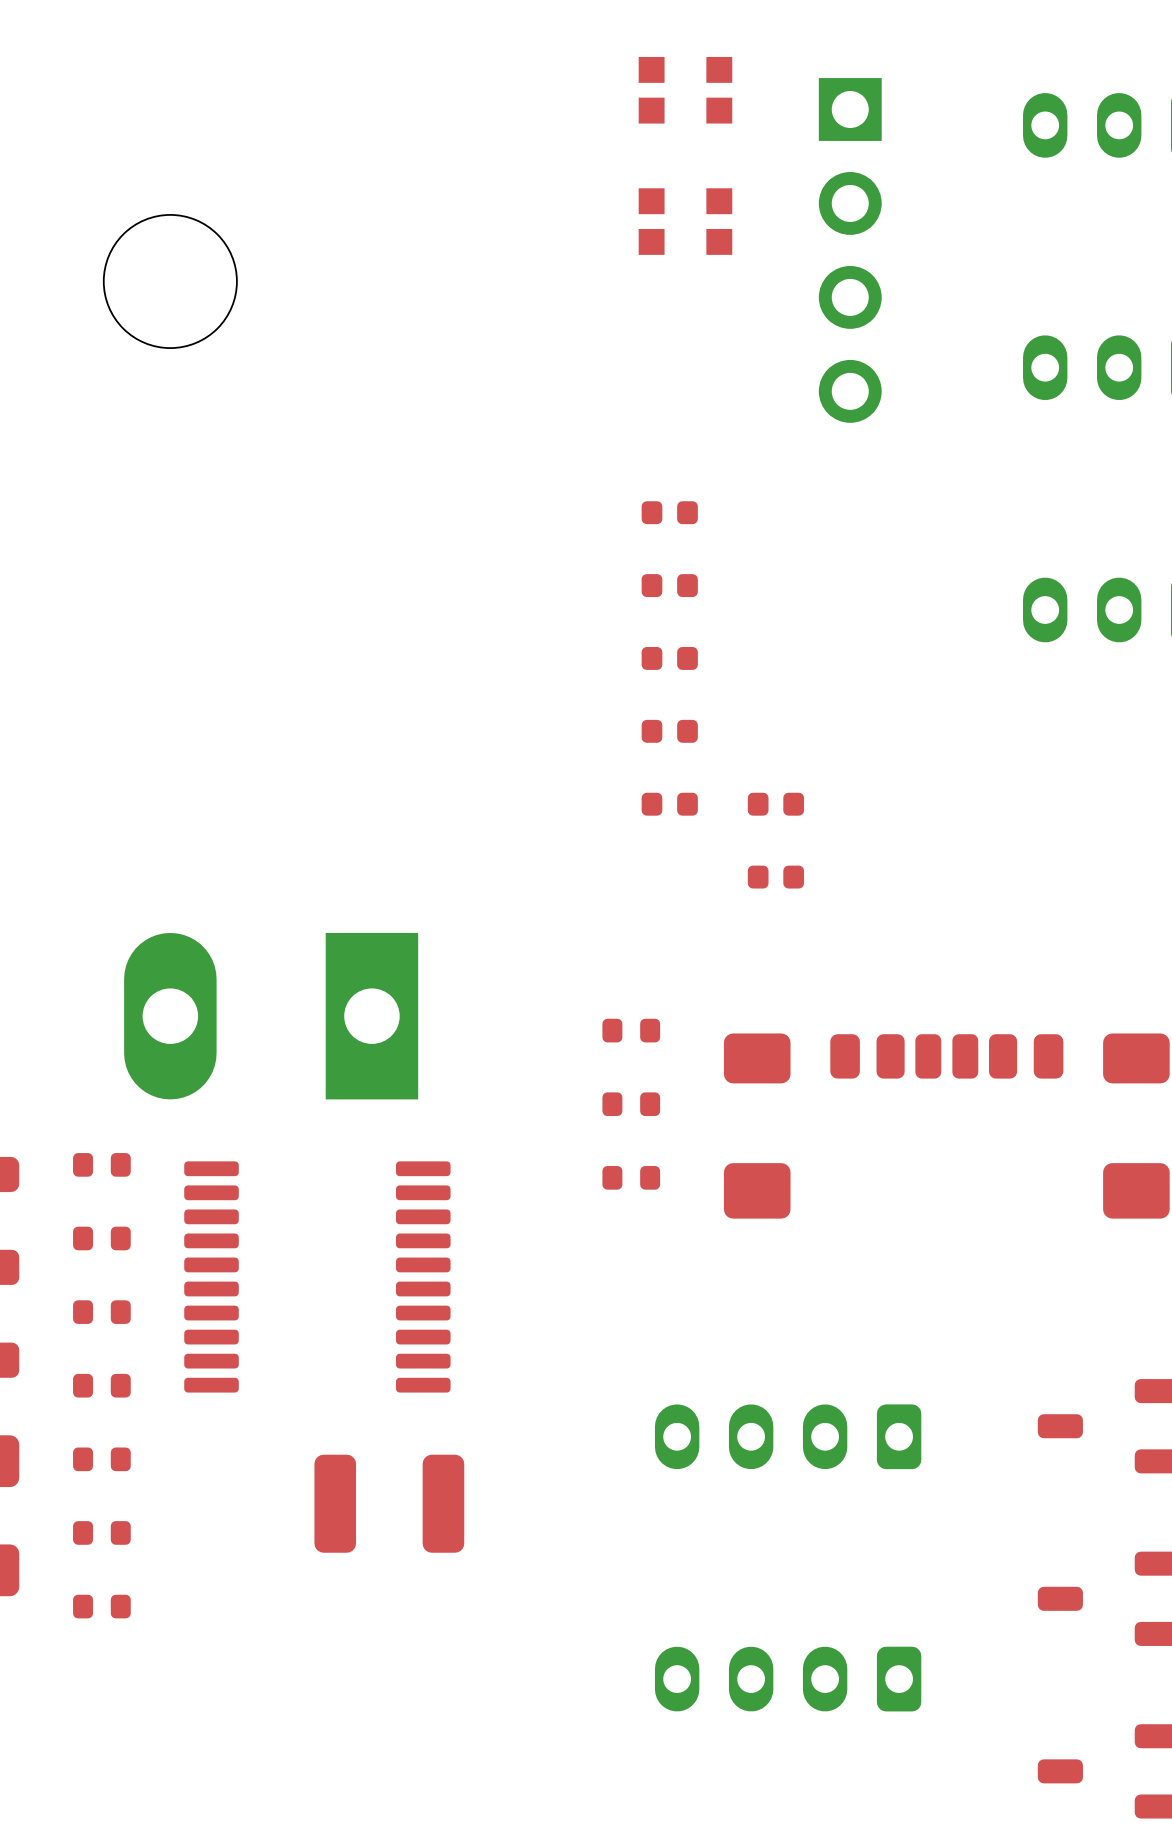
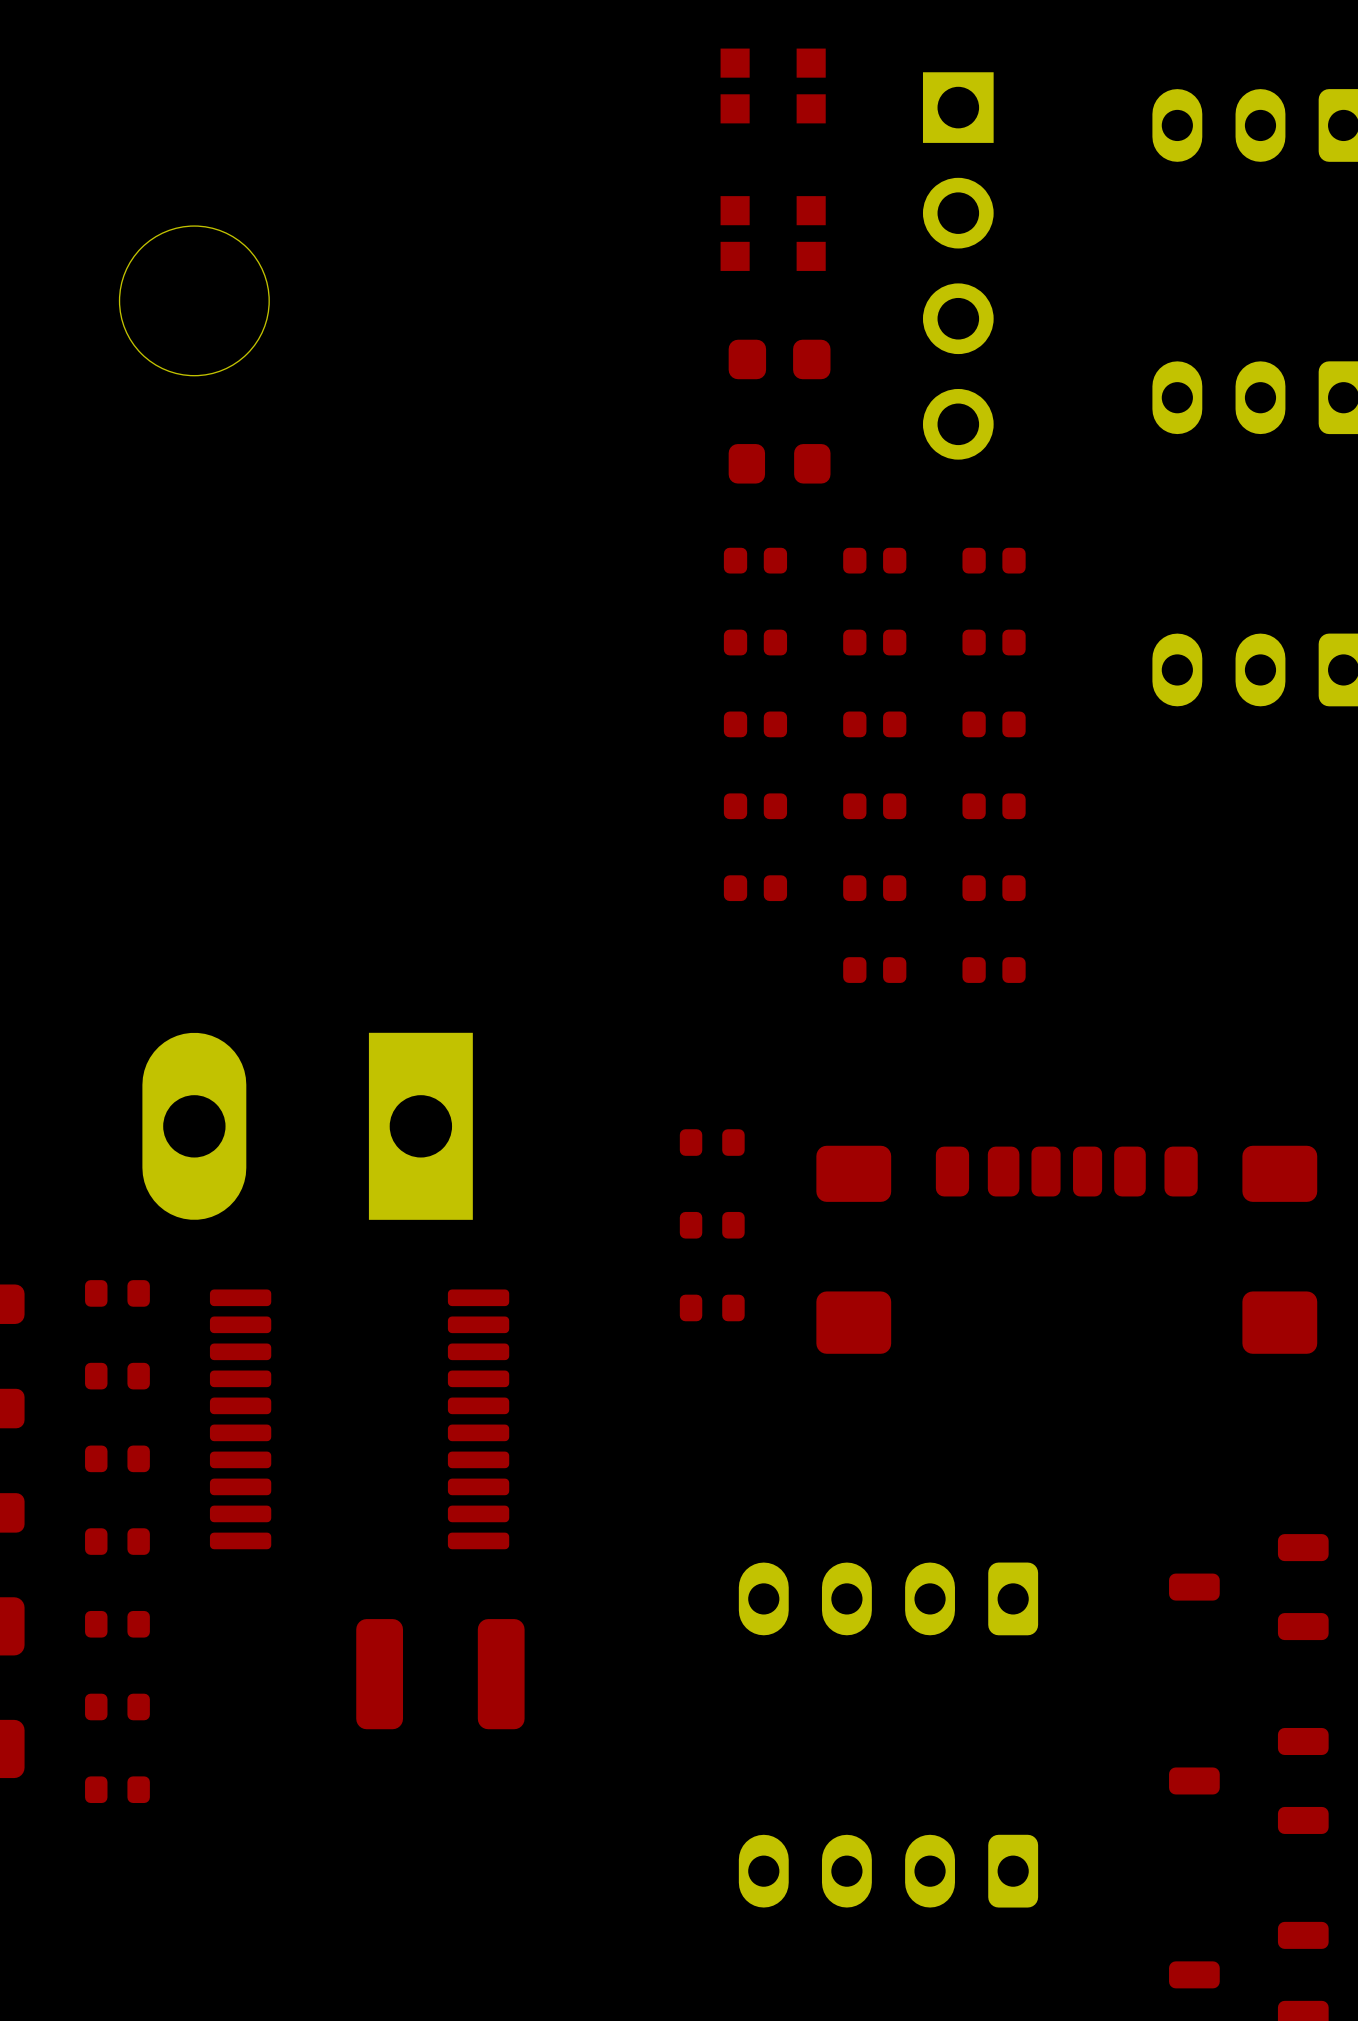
part: none -> (779, 359)
part: none -> (779, 463)
part: none -> (874, 560)
part: none -> (994, 560)
part: none -> (874, 642)
part: none -> (994, 642)
part: none -> (874, 724)
part: none -> (994, 724)
part: none -> (874, 806)
part: none -> (994, 806)
part: none -> (994, 888)
part: none -> (994, 970)

